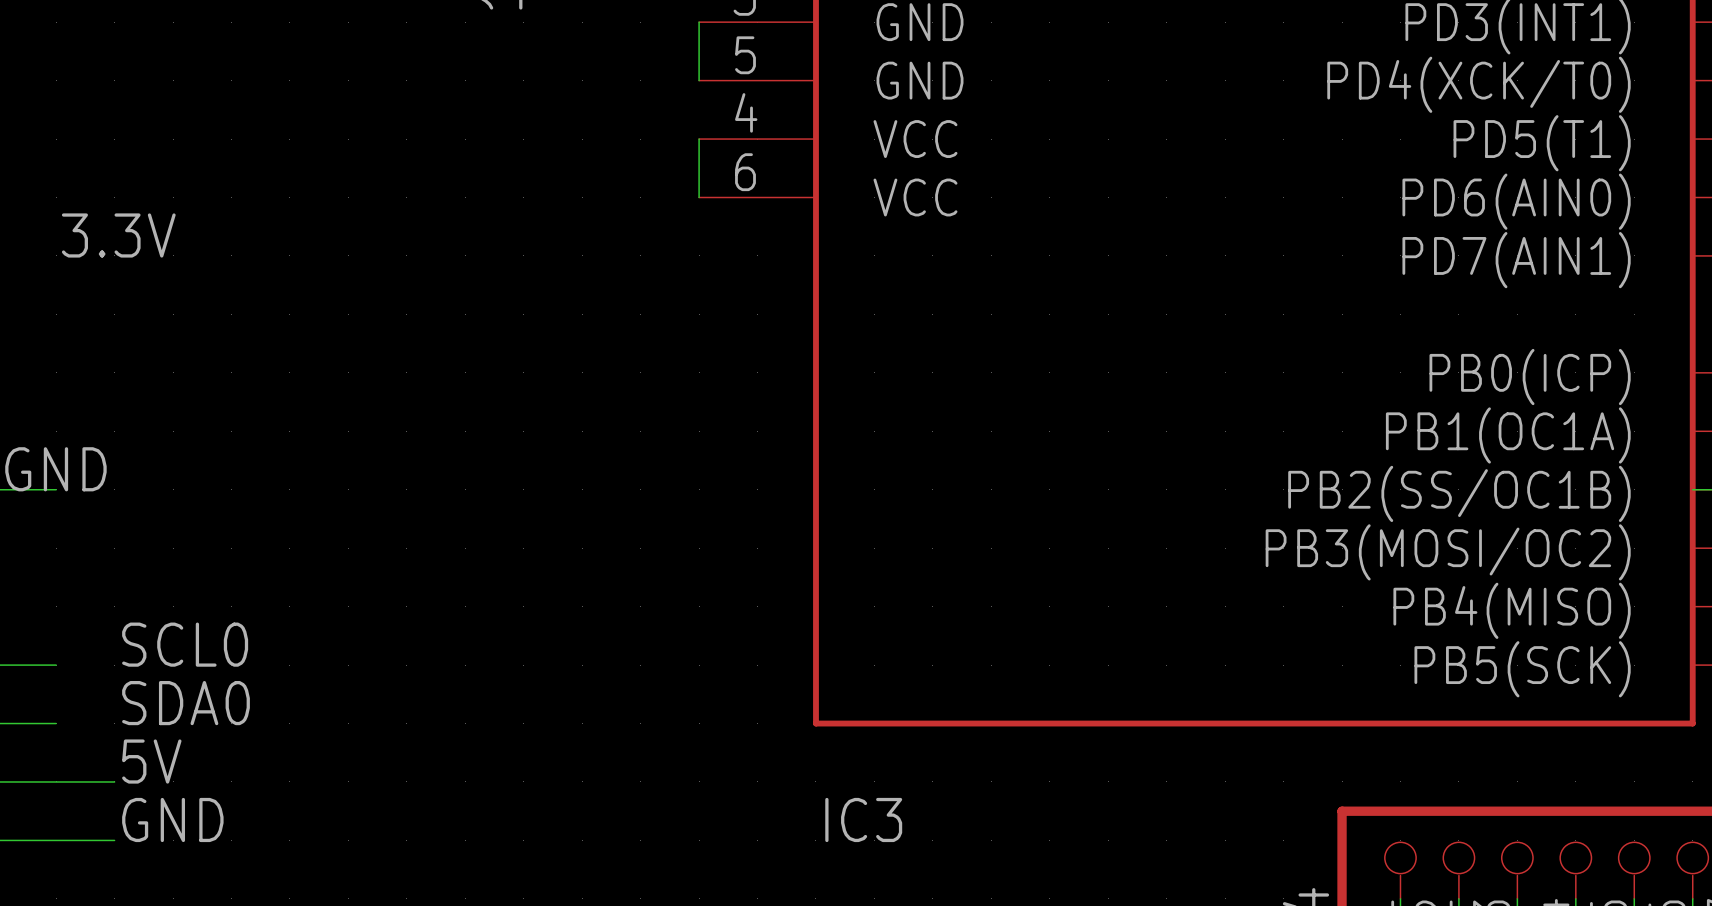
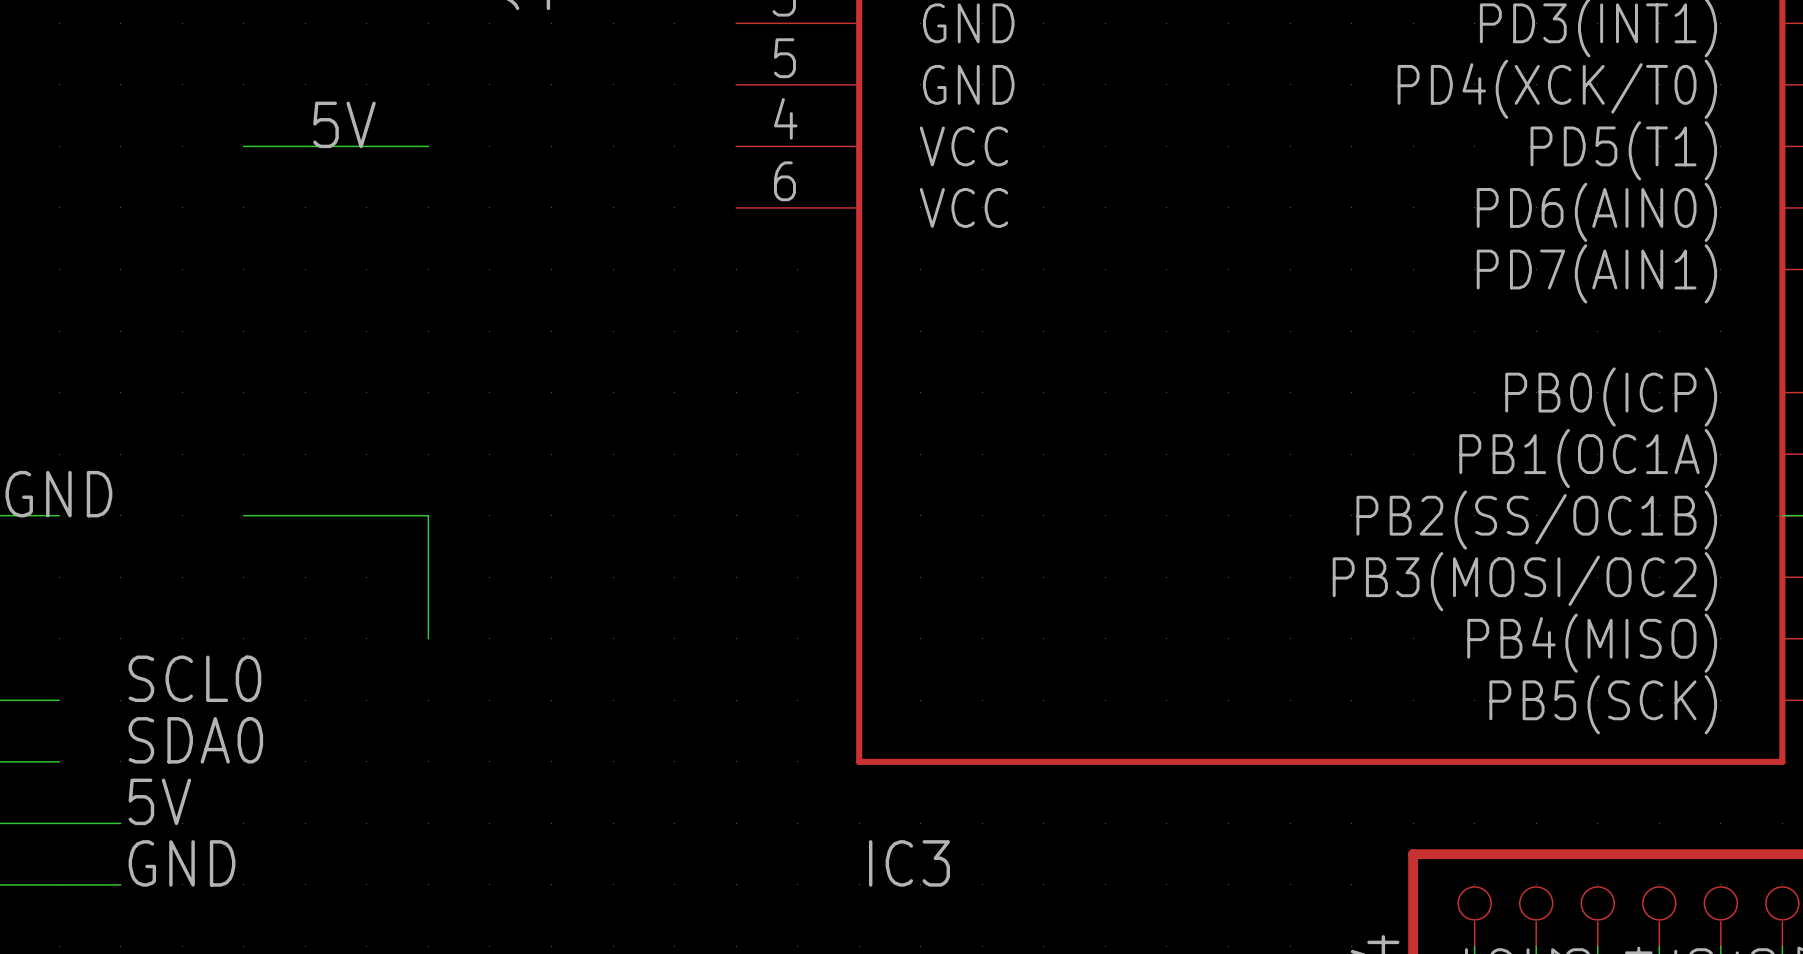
wire: (699, 22) (699, 80) -> none
label: none -> 5V (344, 124)
wire: none -> (243, 146) (428, 146)
wire: (699, 139) (699, 197) -> none
label: 3.3V (118, 235) -> none
wire: none -> (243, 515) (428, 515) (428, 638)

